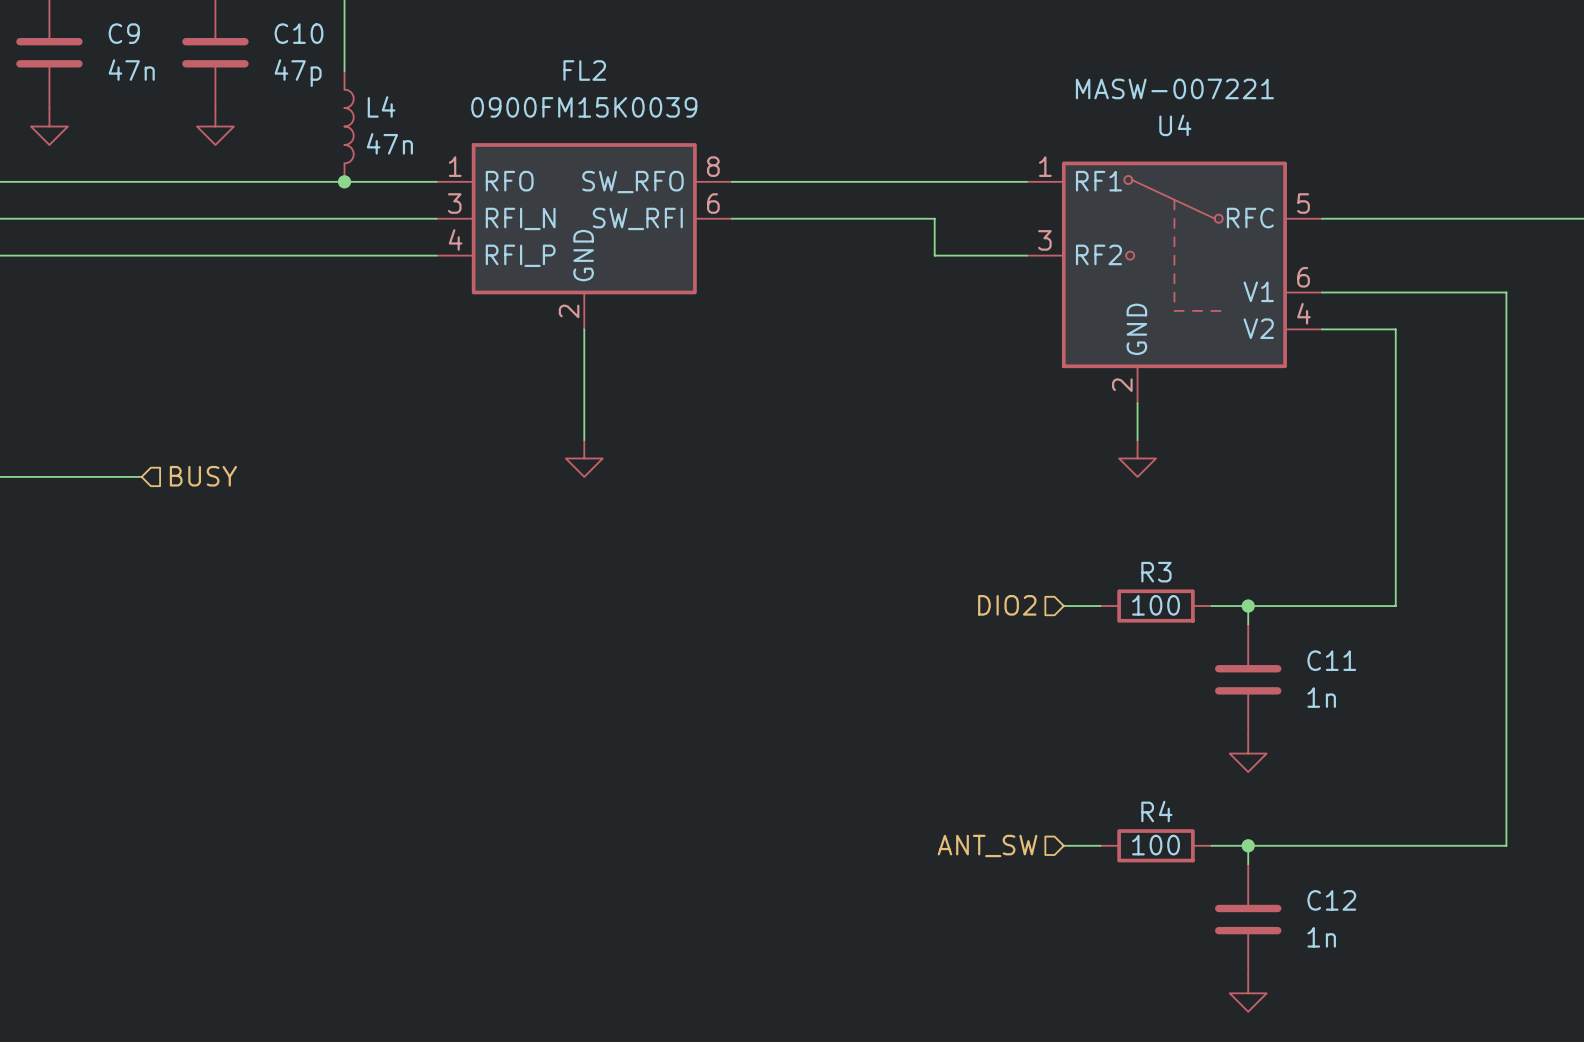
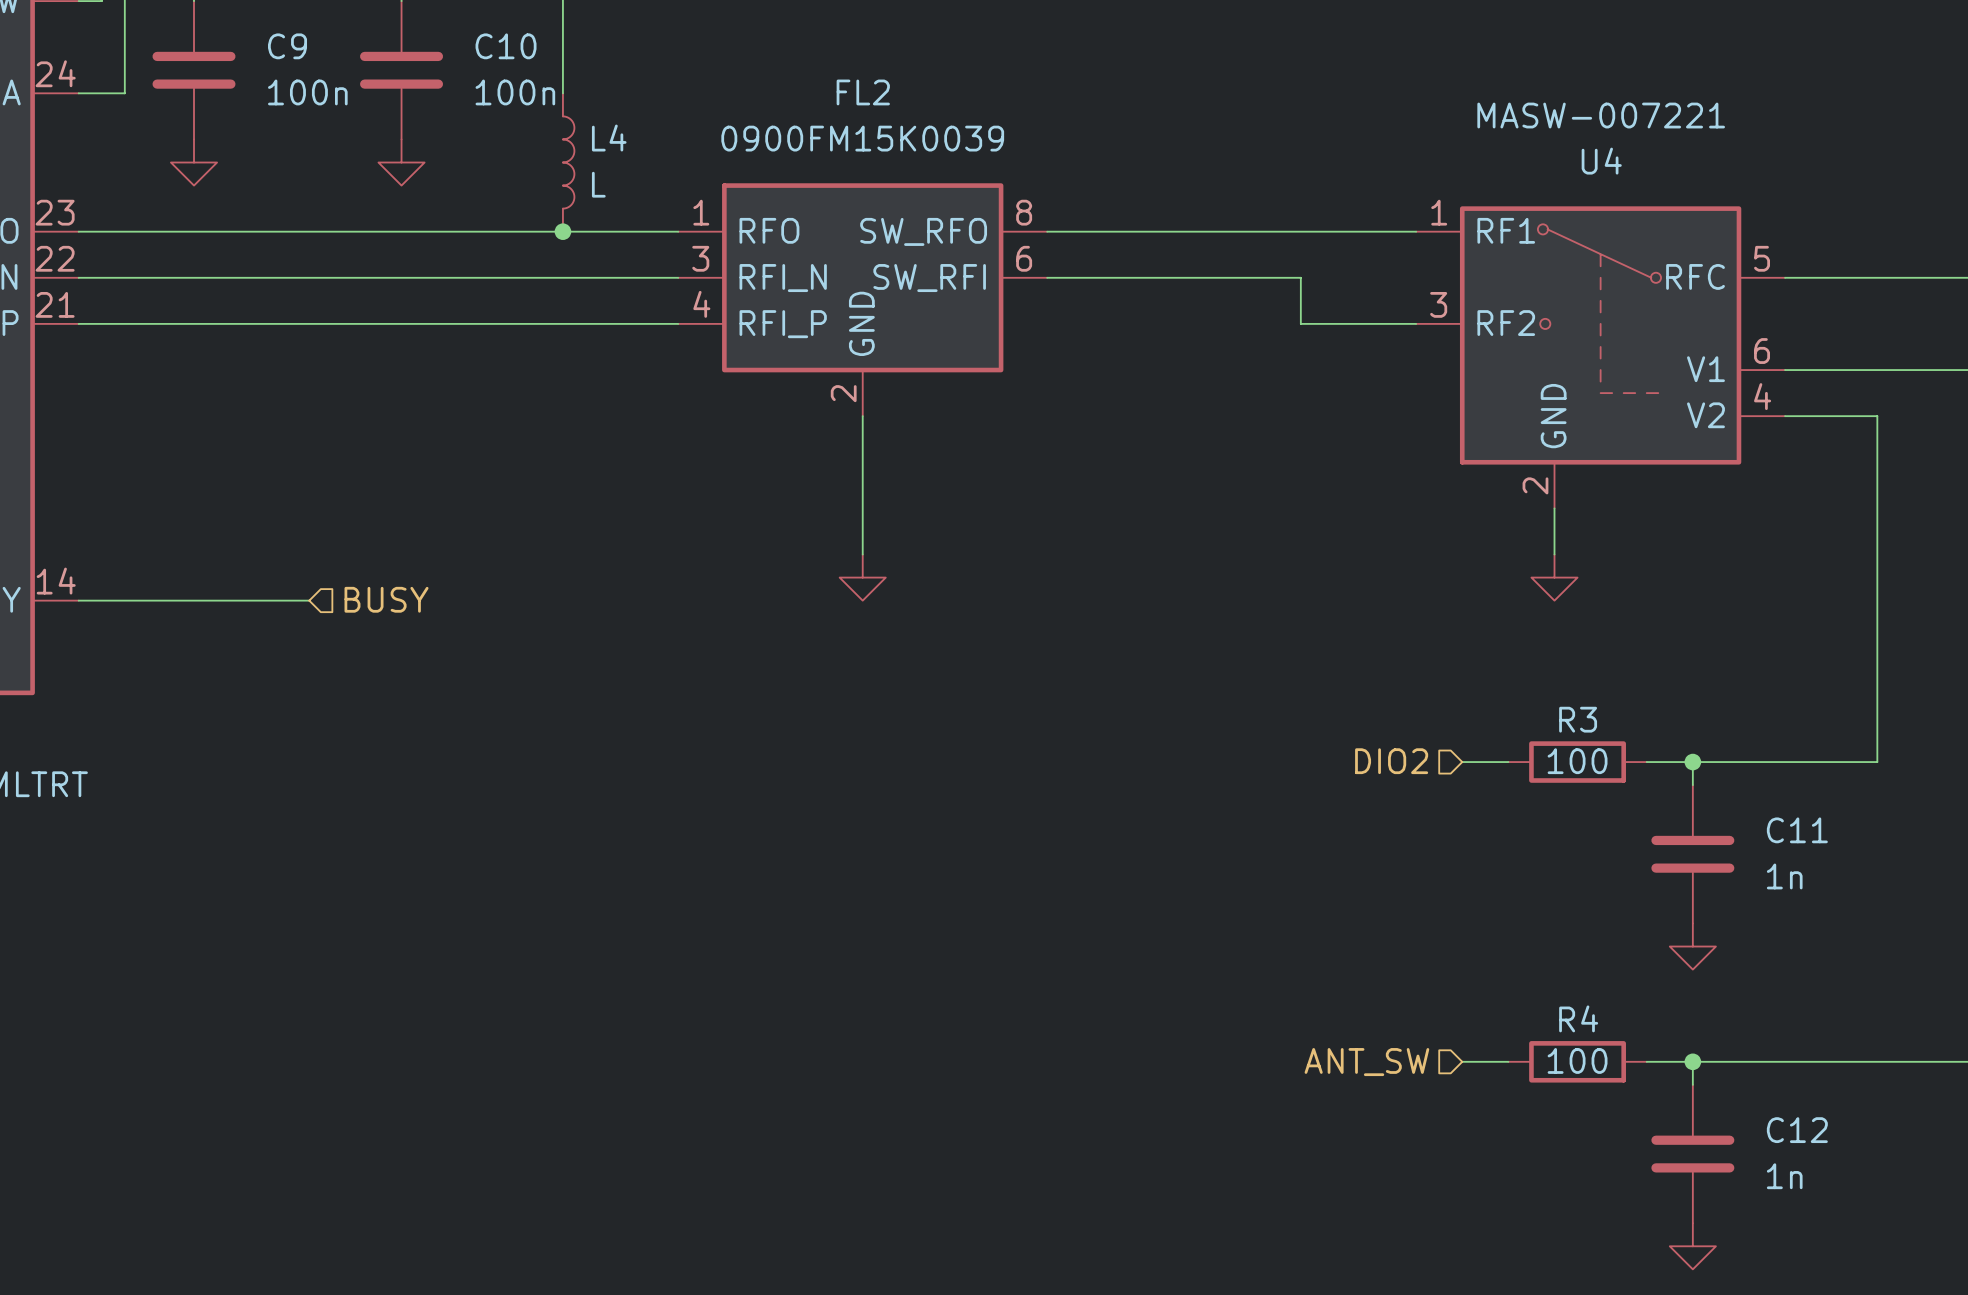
C9 value: 47n (131, 70) -> 100n (307, 92)
C10 value: 47p (298, 73) -> 100n (515, 92)
L4 value: 47n (389, 143) -> L (598, 184)

